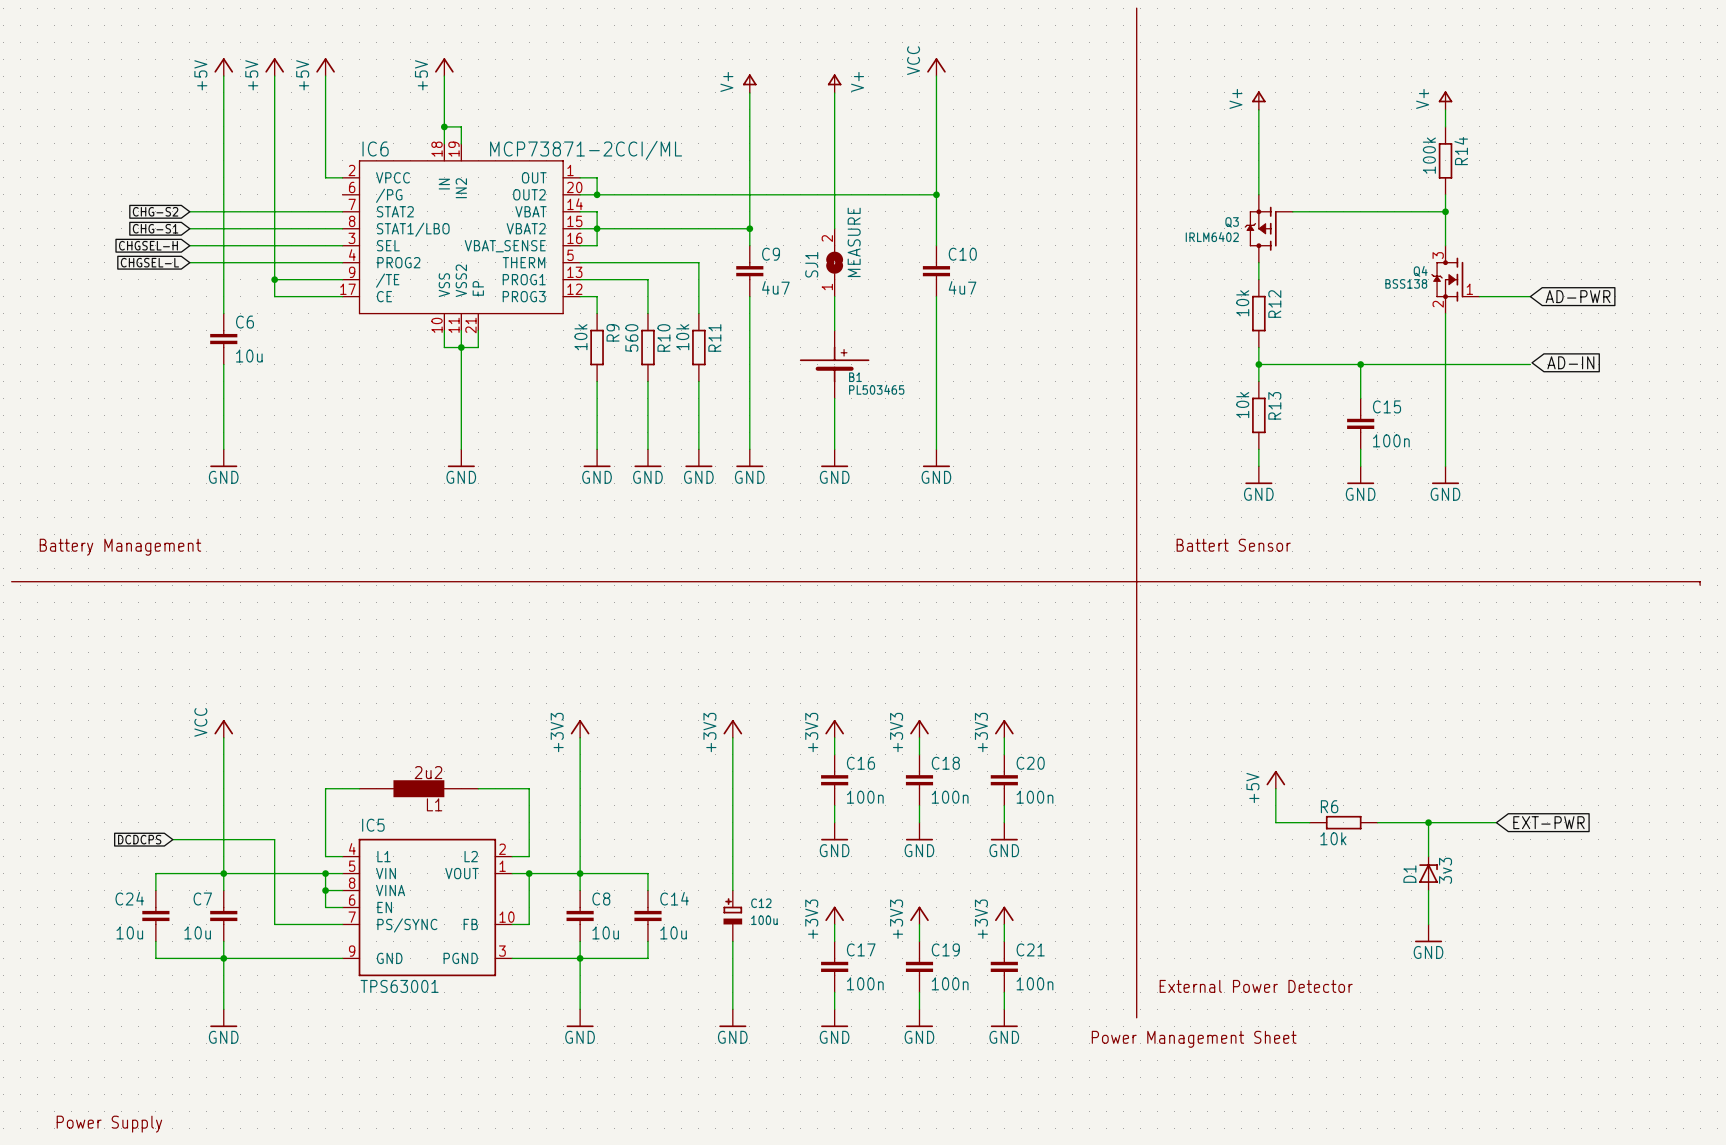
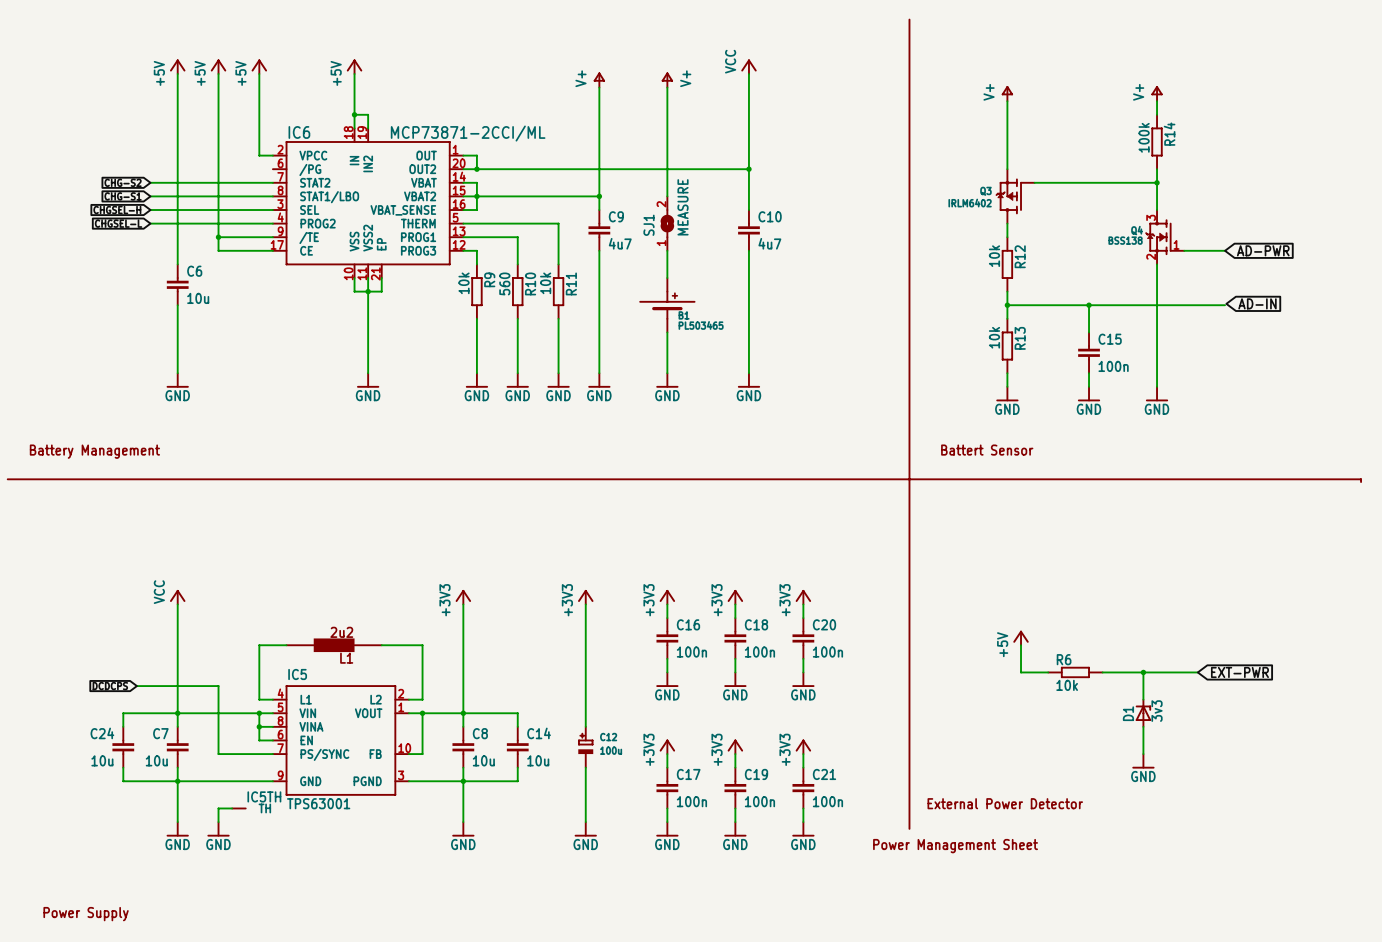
wire: none -> (232, 808) (218, 808) (218, 822)
IC5TH: none -> (238, 808)
power symbol: none -> GND (218, 829)

